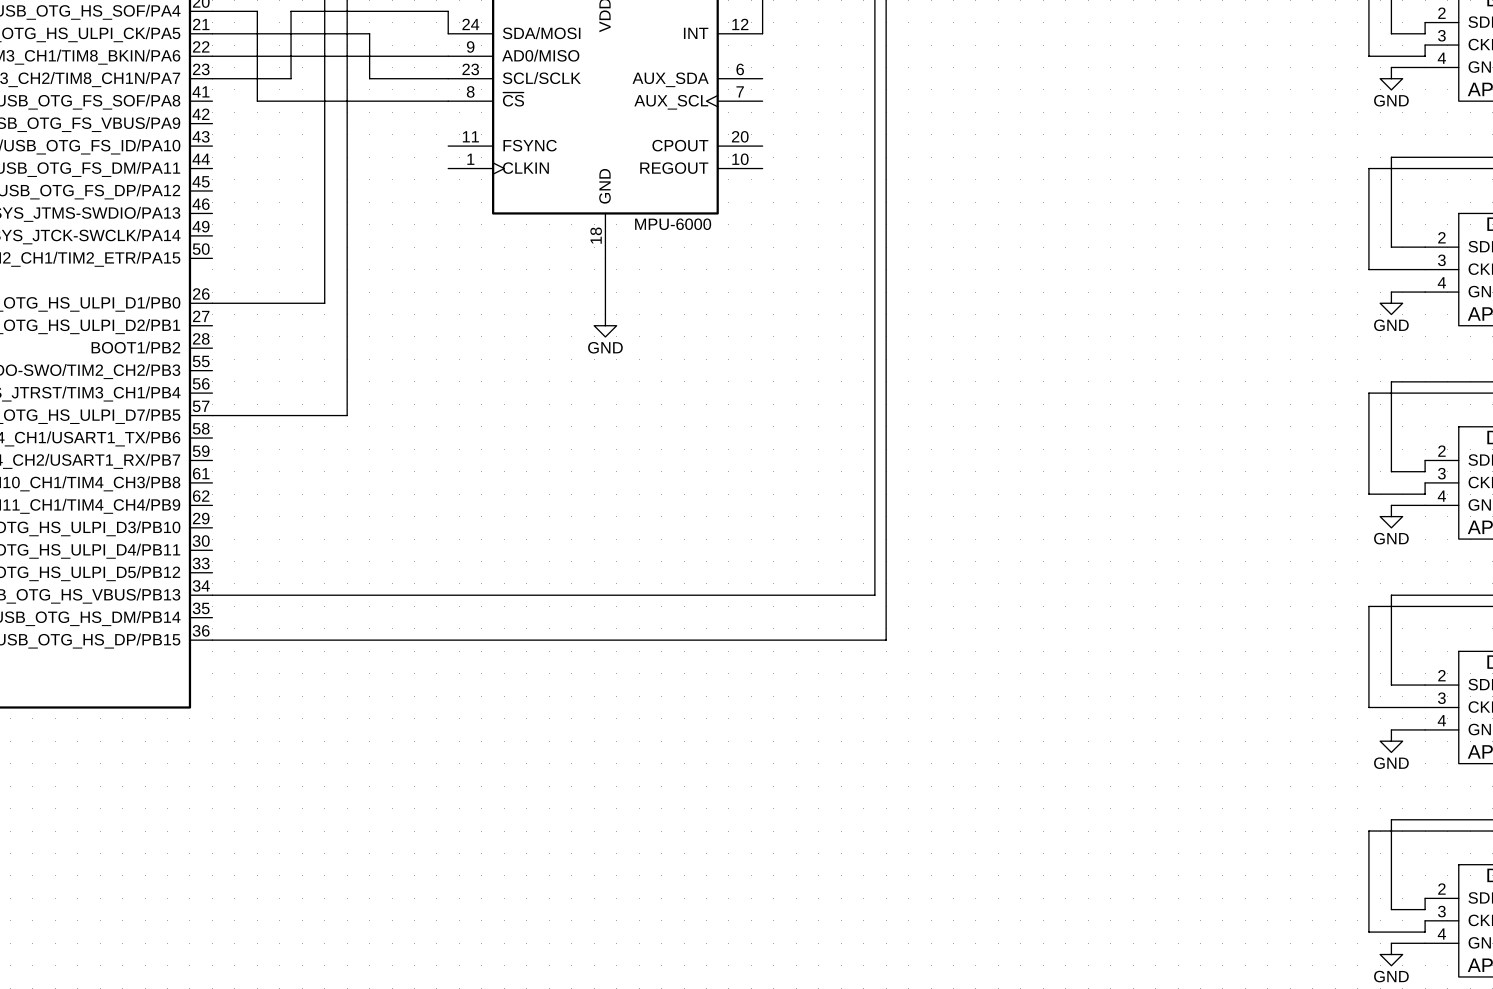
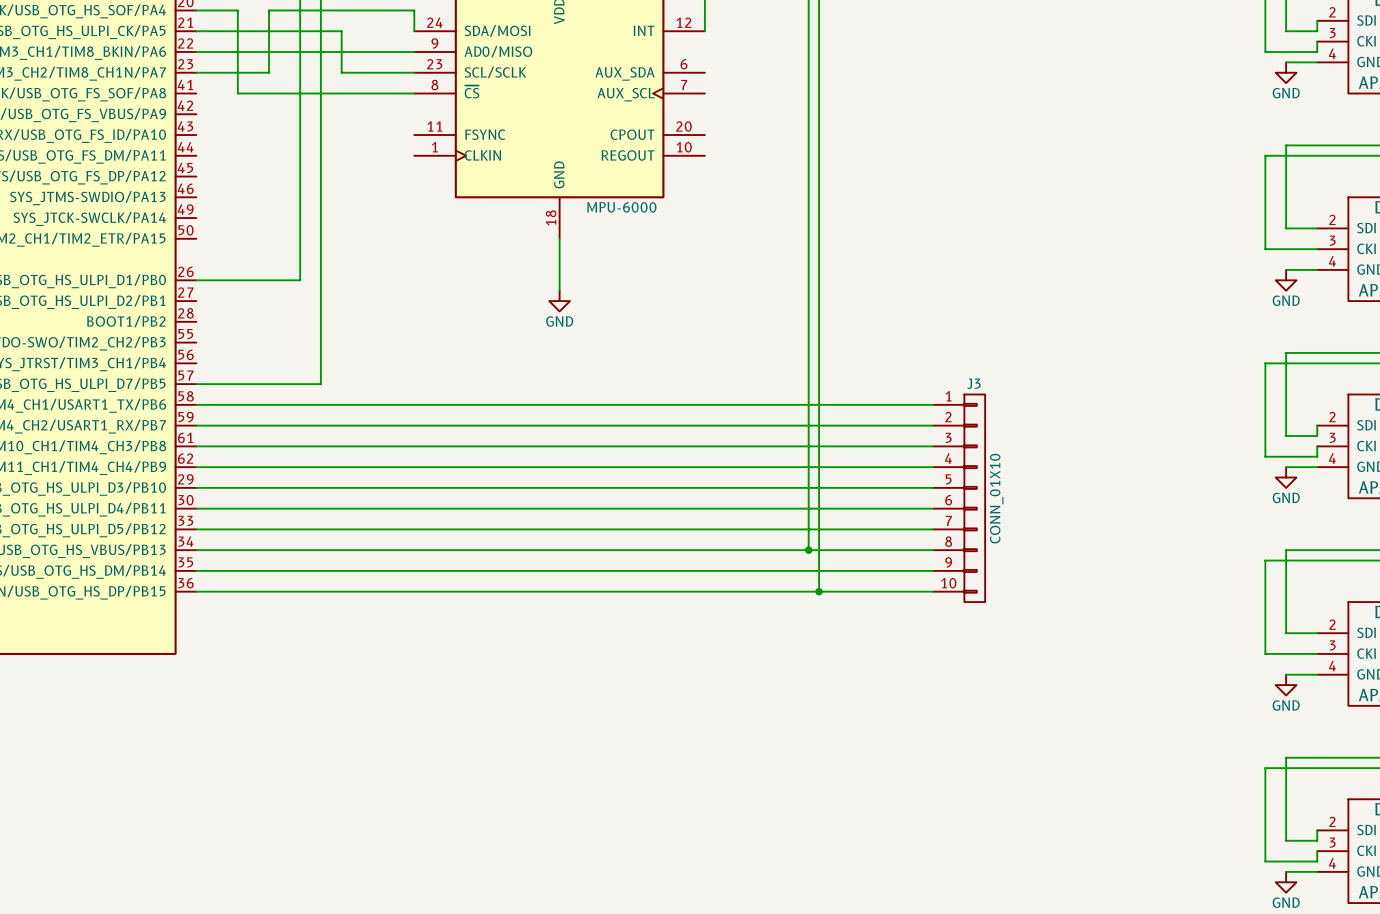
wire: none -> (196, 404) (933, 404)
wire: none -> (196, 425) (933, 425)
wire: none -> (196, 446) (933, 446)
wire: none -> (196, 467) (933, 467)
wire: none -> (196, 487) (933, 487)
J3: none -> CONN_01X10 (959, 498)
wire: none -> (196, 508) (933, 508)
wire: none -> (196, 529) (933, 529)
wire: none -> (808, 550) (933, 550)
junction: none -> (808, 550)
wire: none -> (196, 570) (933, 570)
wire: none -> (819, 591) (933, 591)
junction: none -> (819, 591)

